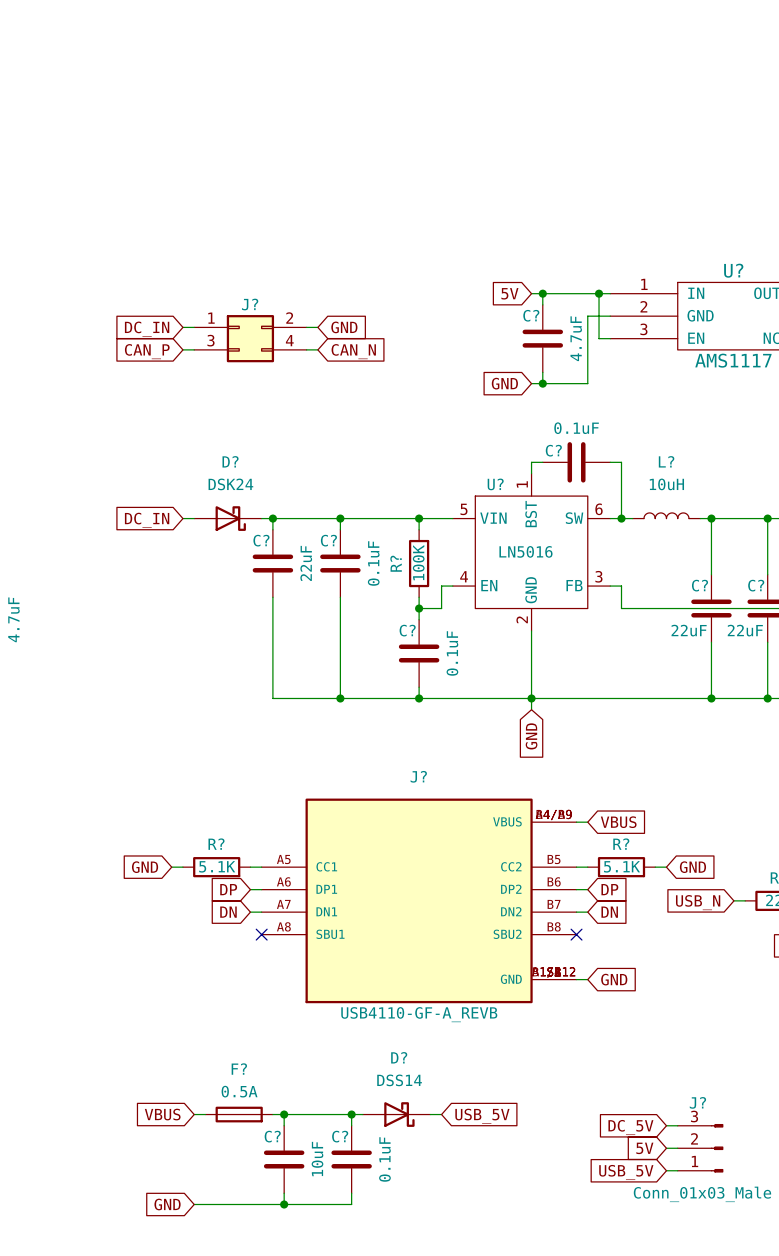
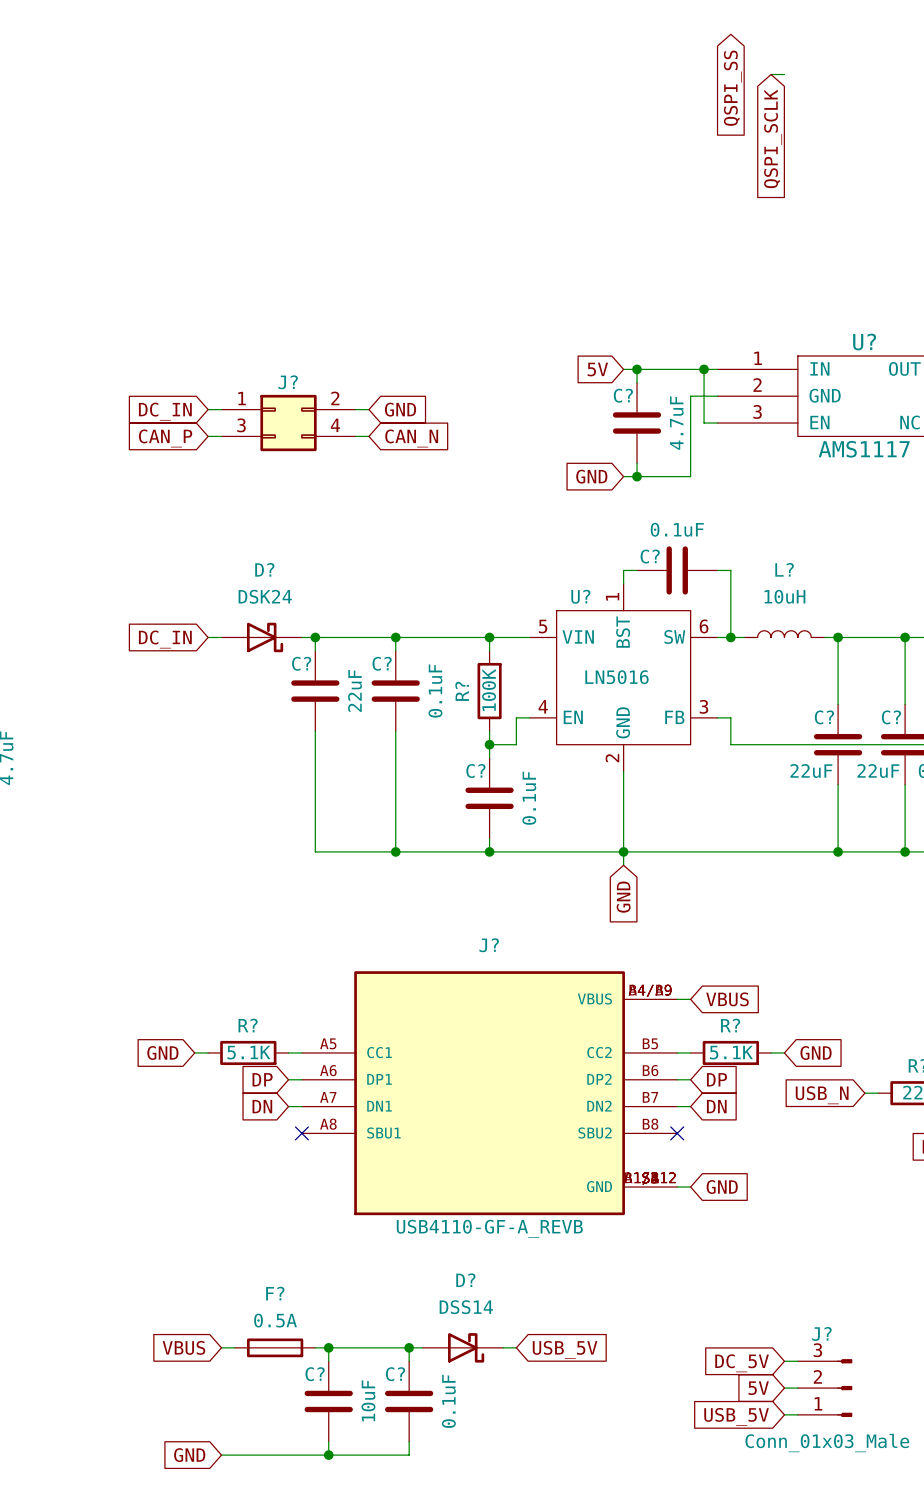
wire: none -> (771, 74) (784, 74)
global label: none -> QSPI_SS (732, 88)
global label: none -> QSPI_SCLK (773, 138)

